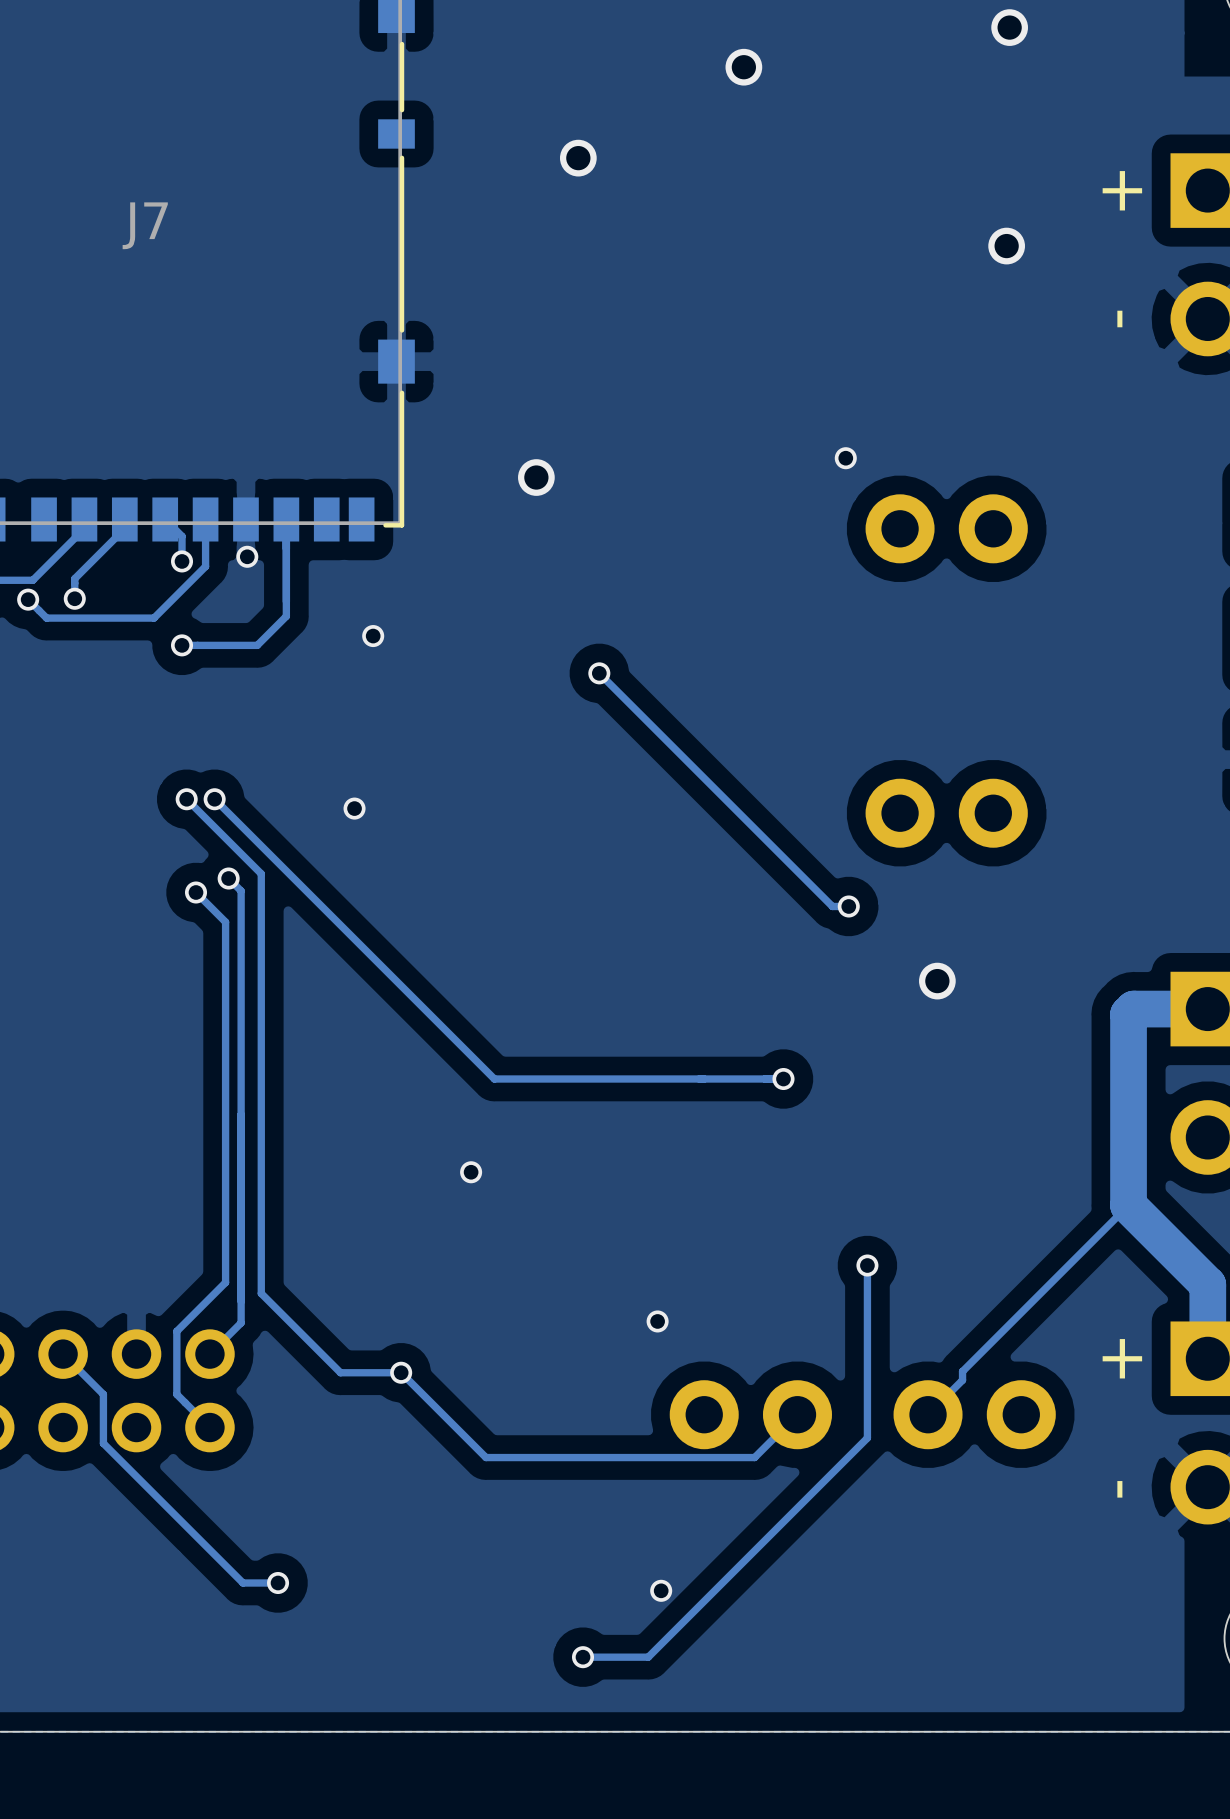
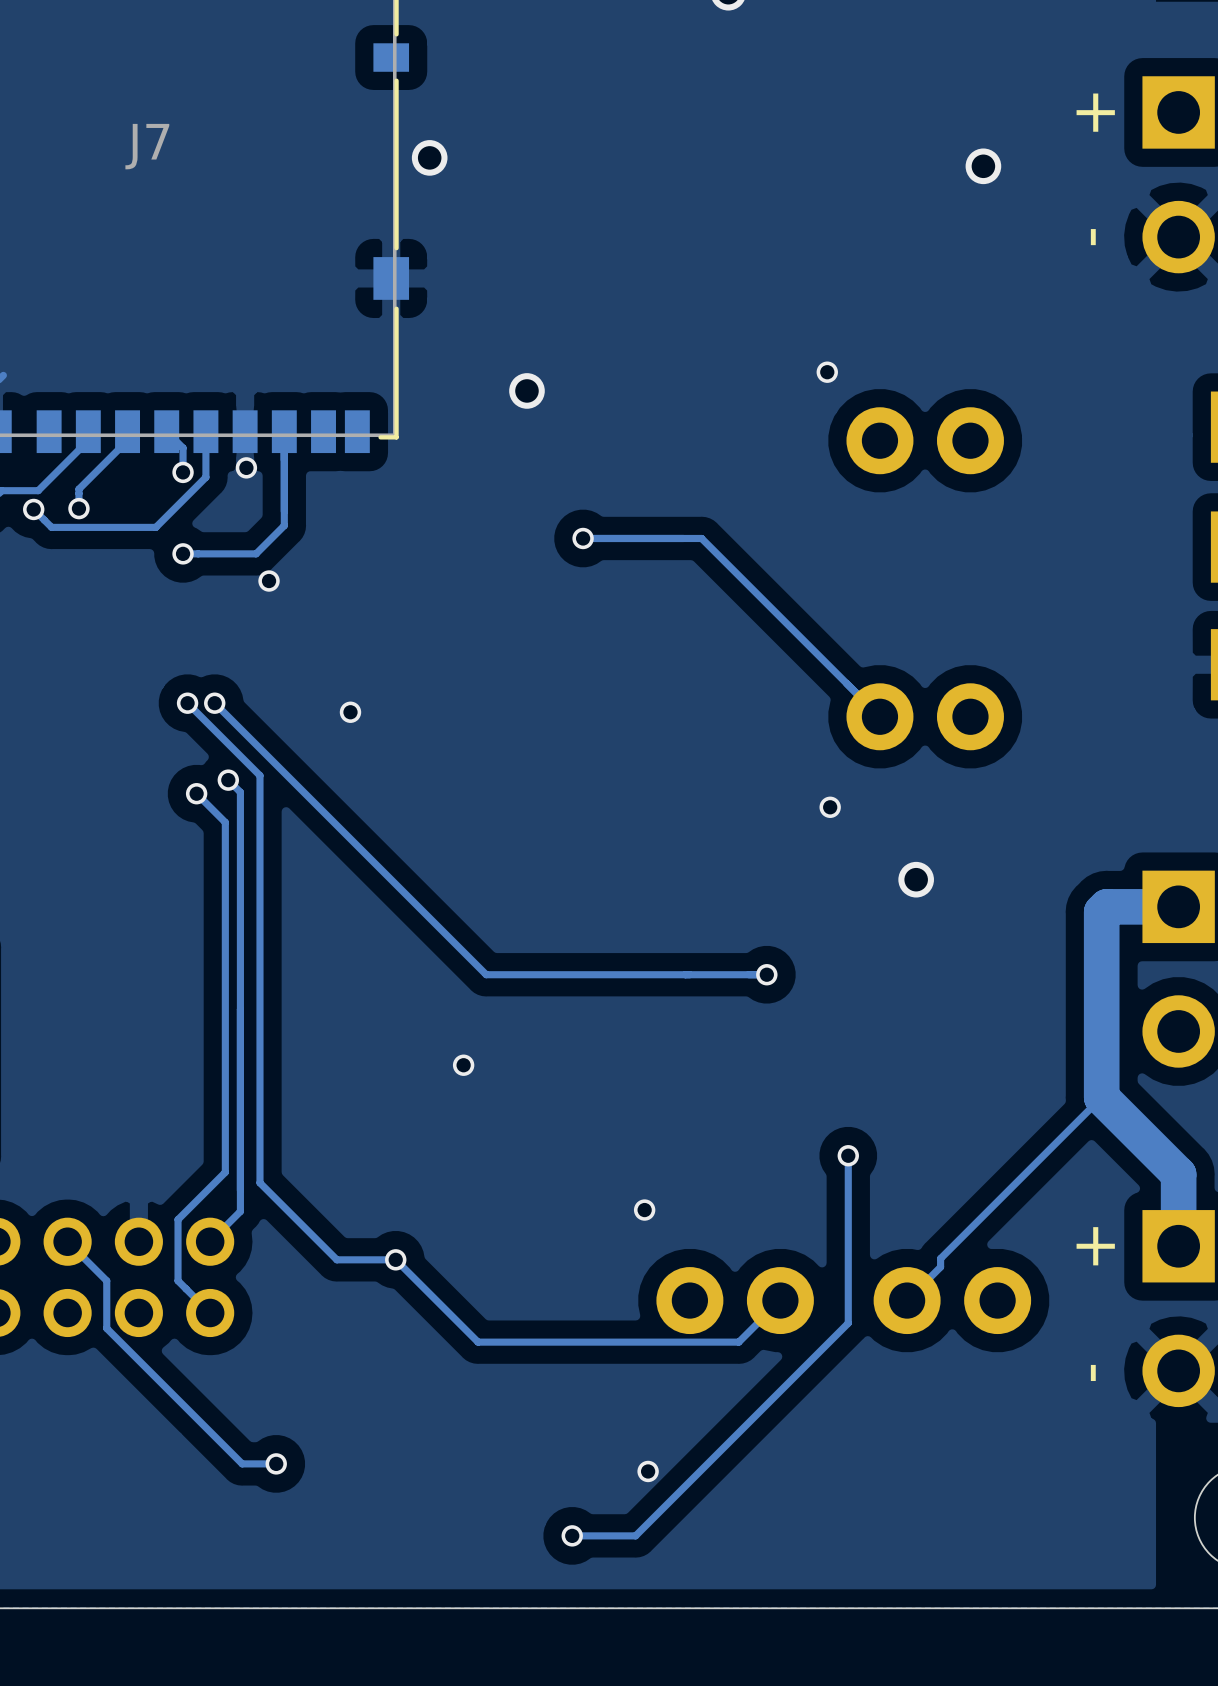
via position: (578, 158) -> (429, 157)
track: none -> (583, 538) (701, 538) (879, 716)
via position: (373, 636) -> (269, 581)
track: (599, 673) (832, 906) (848, 906) -> none
via position: (599, 673) -> (583, 538)

